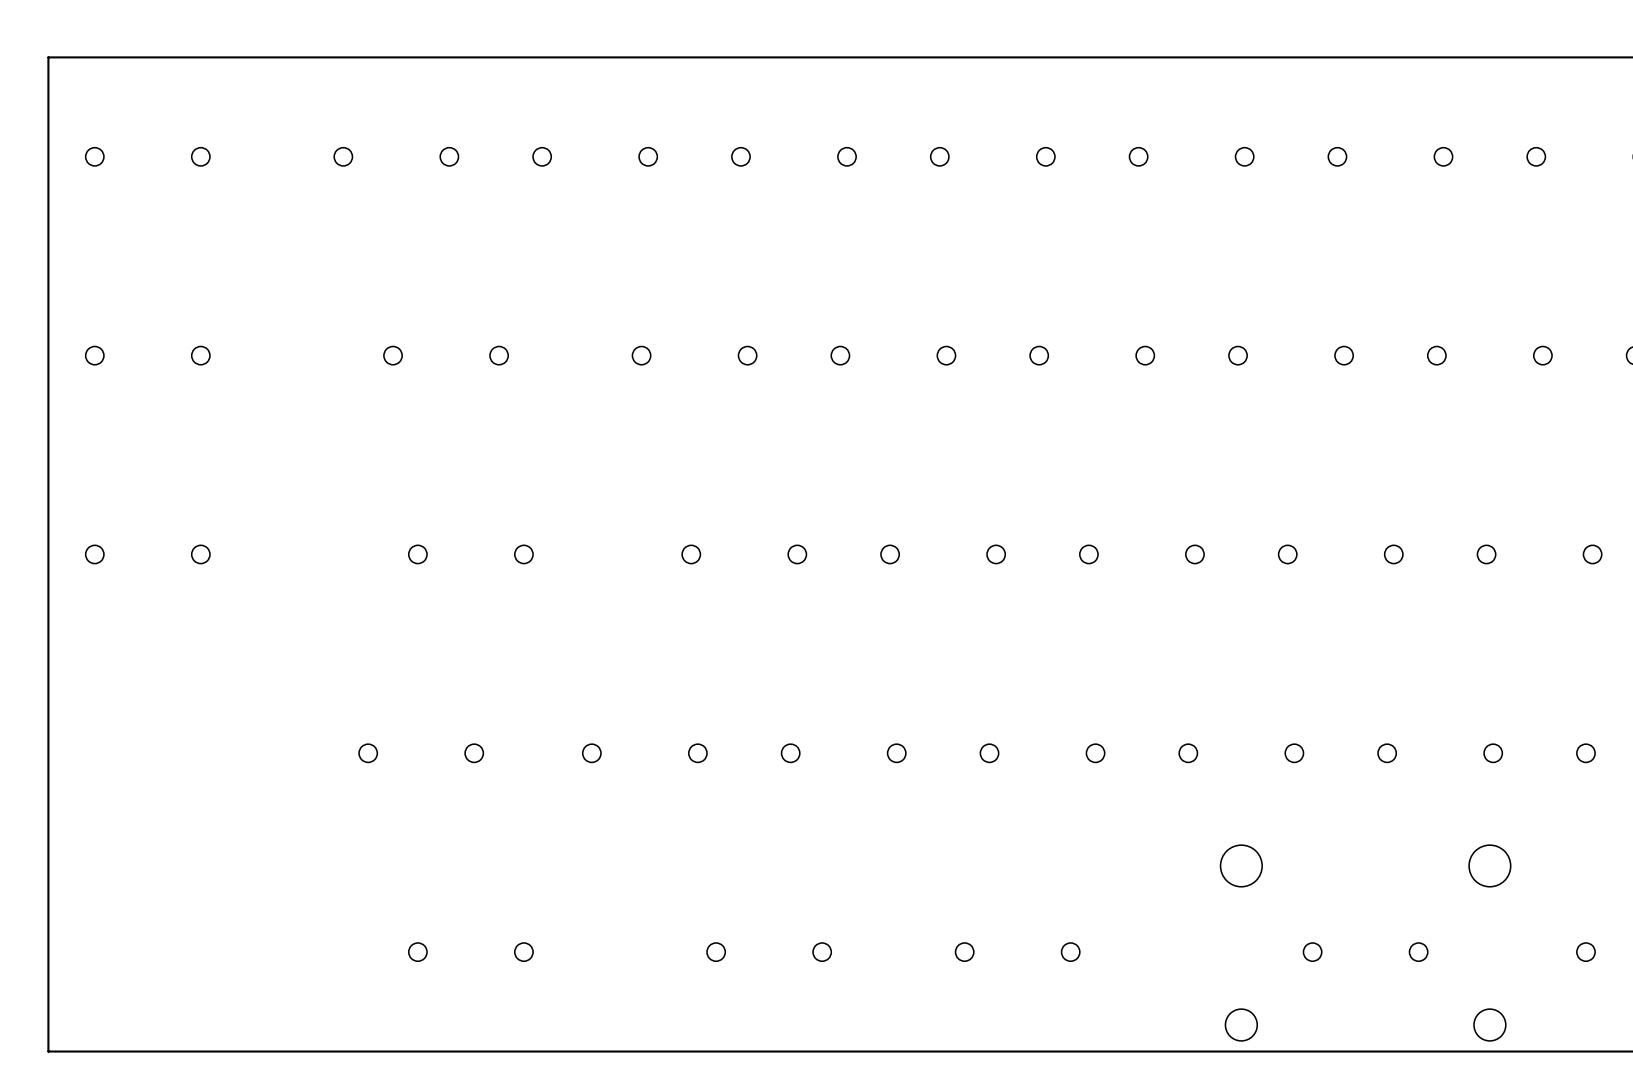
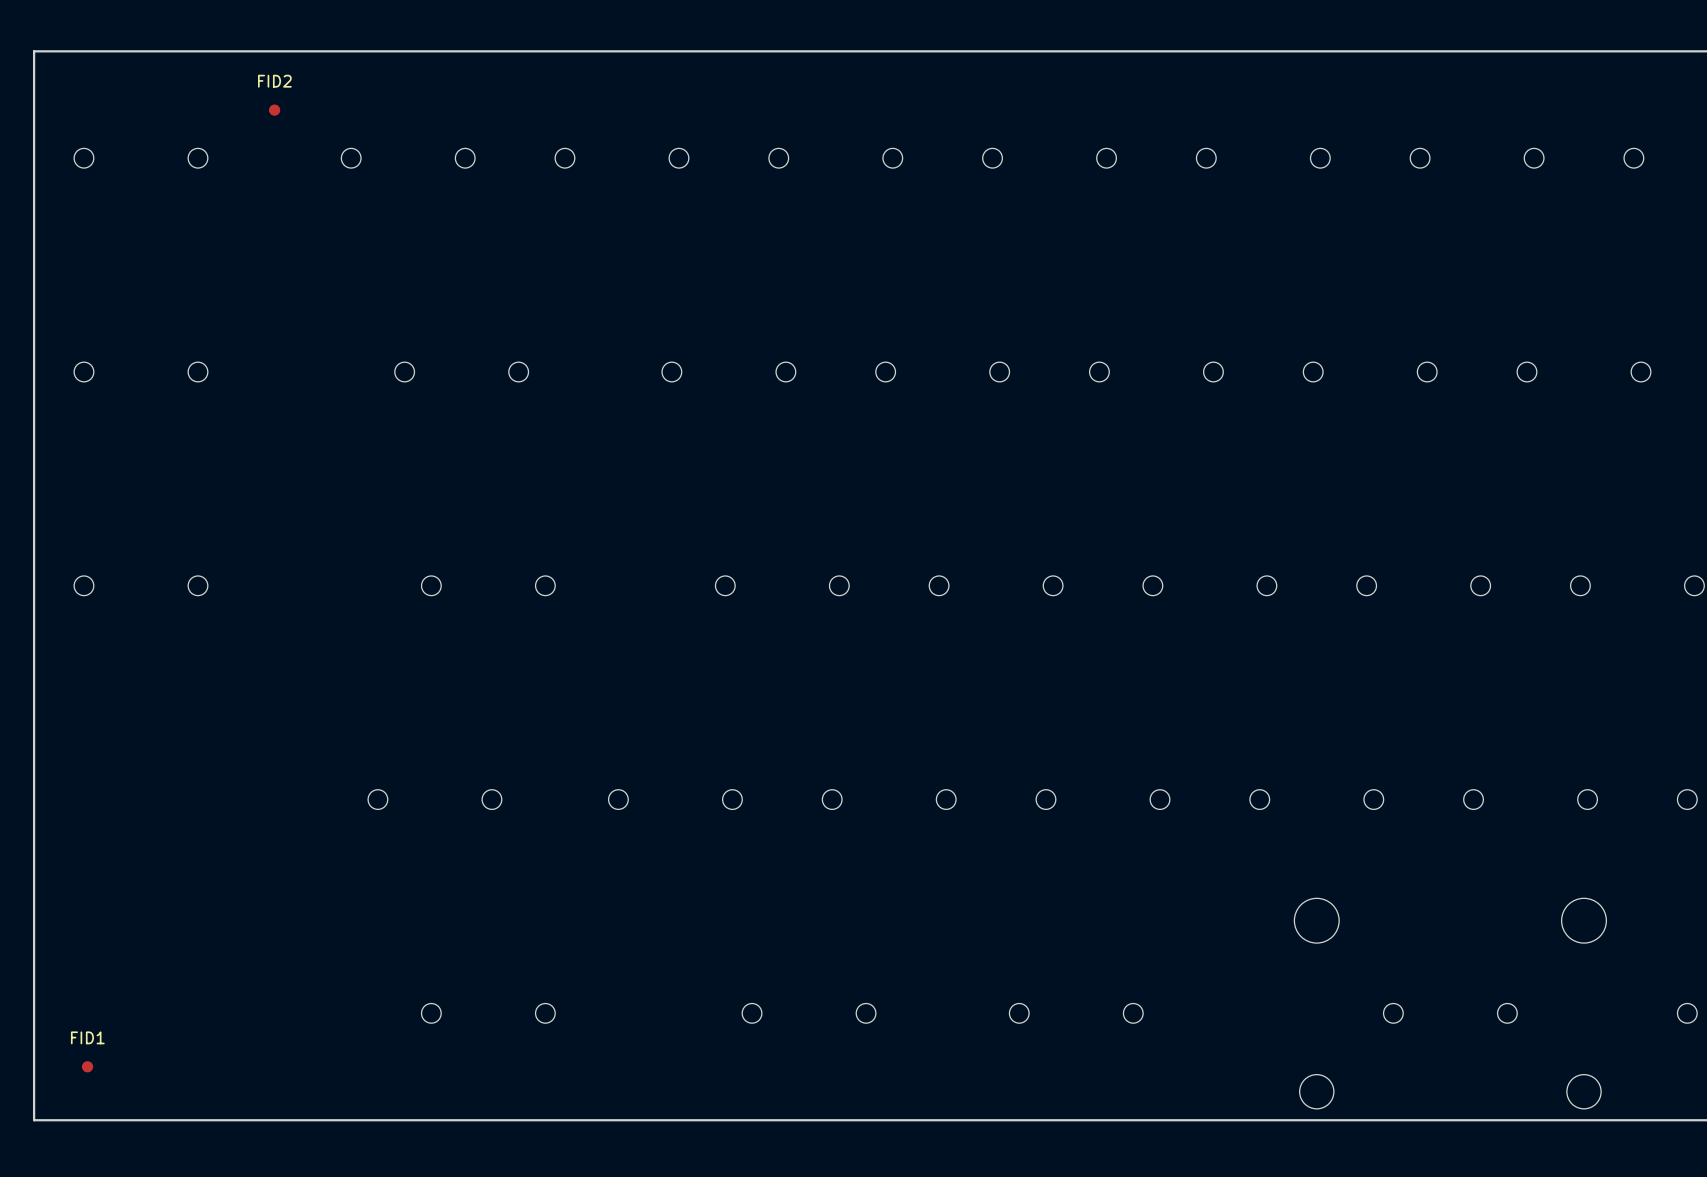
FID2: none -> (274, 110)
FID1: none -> (87, 1066)

